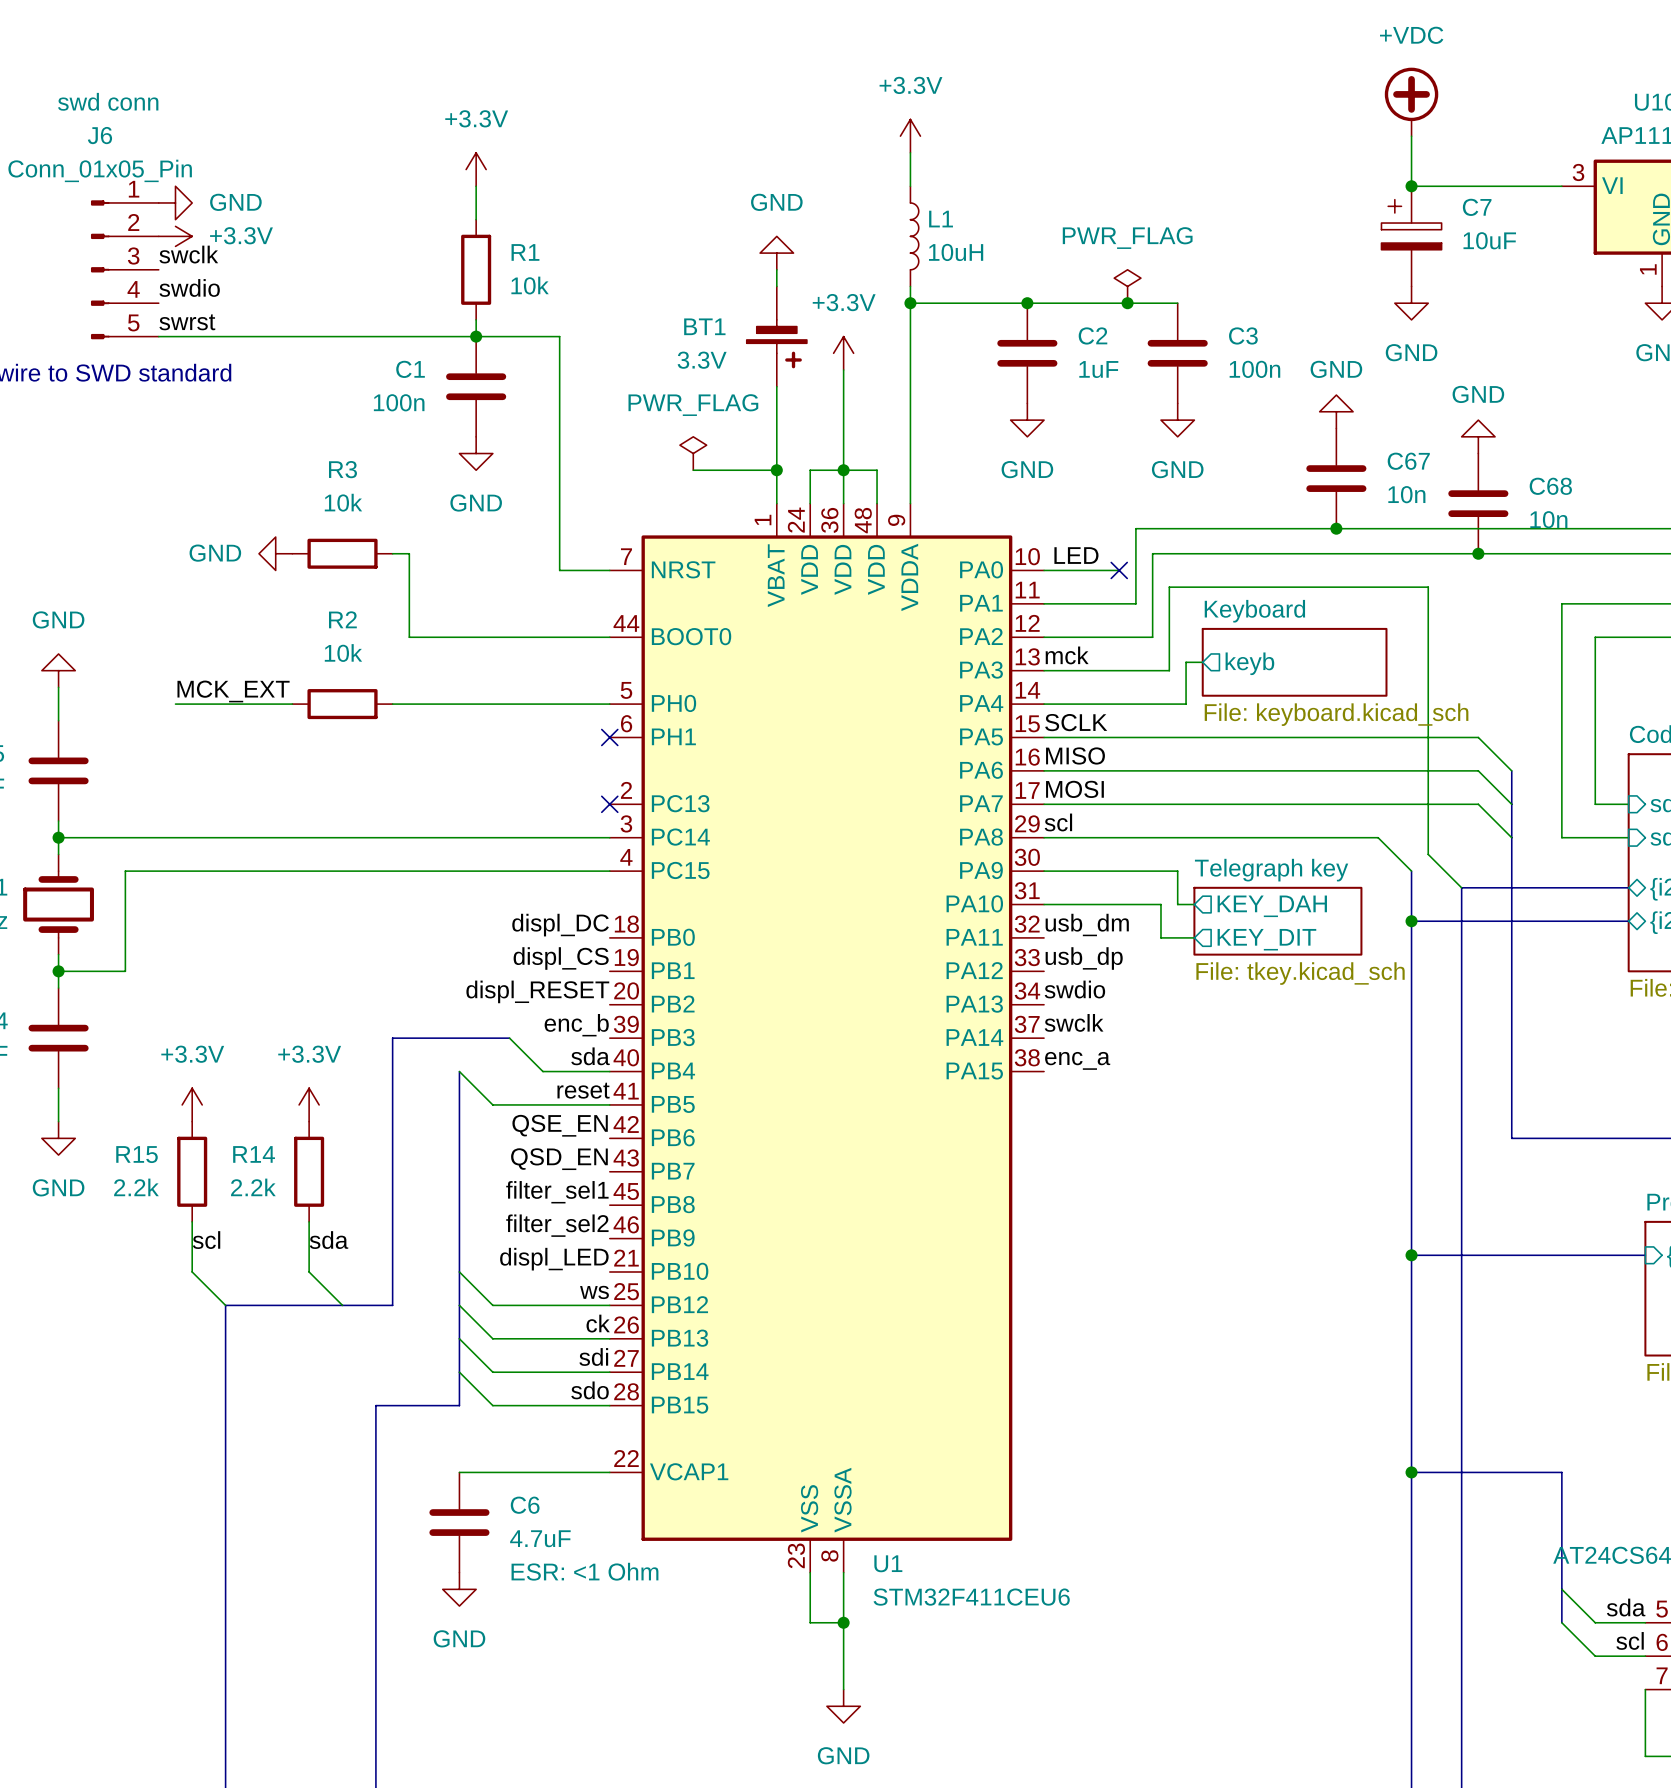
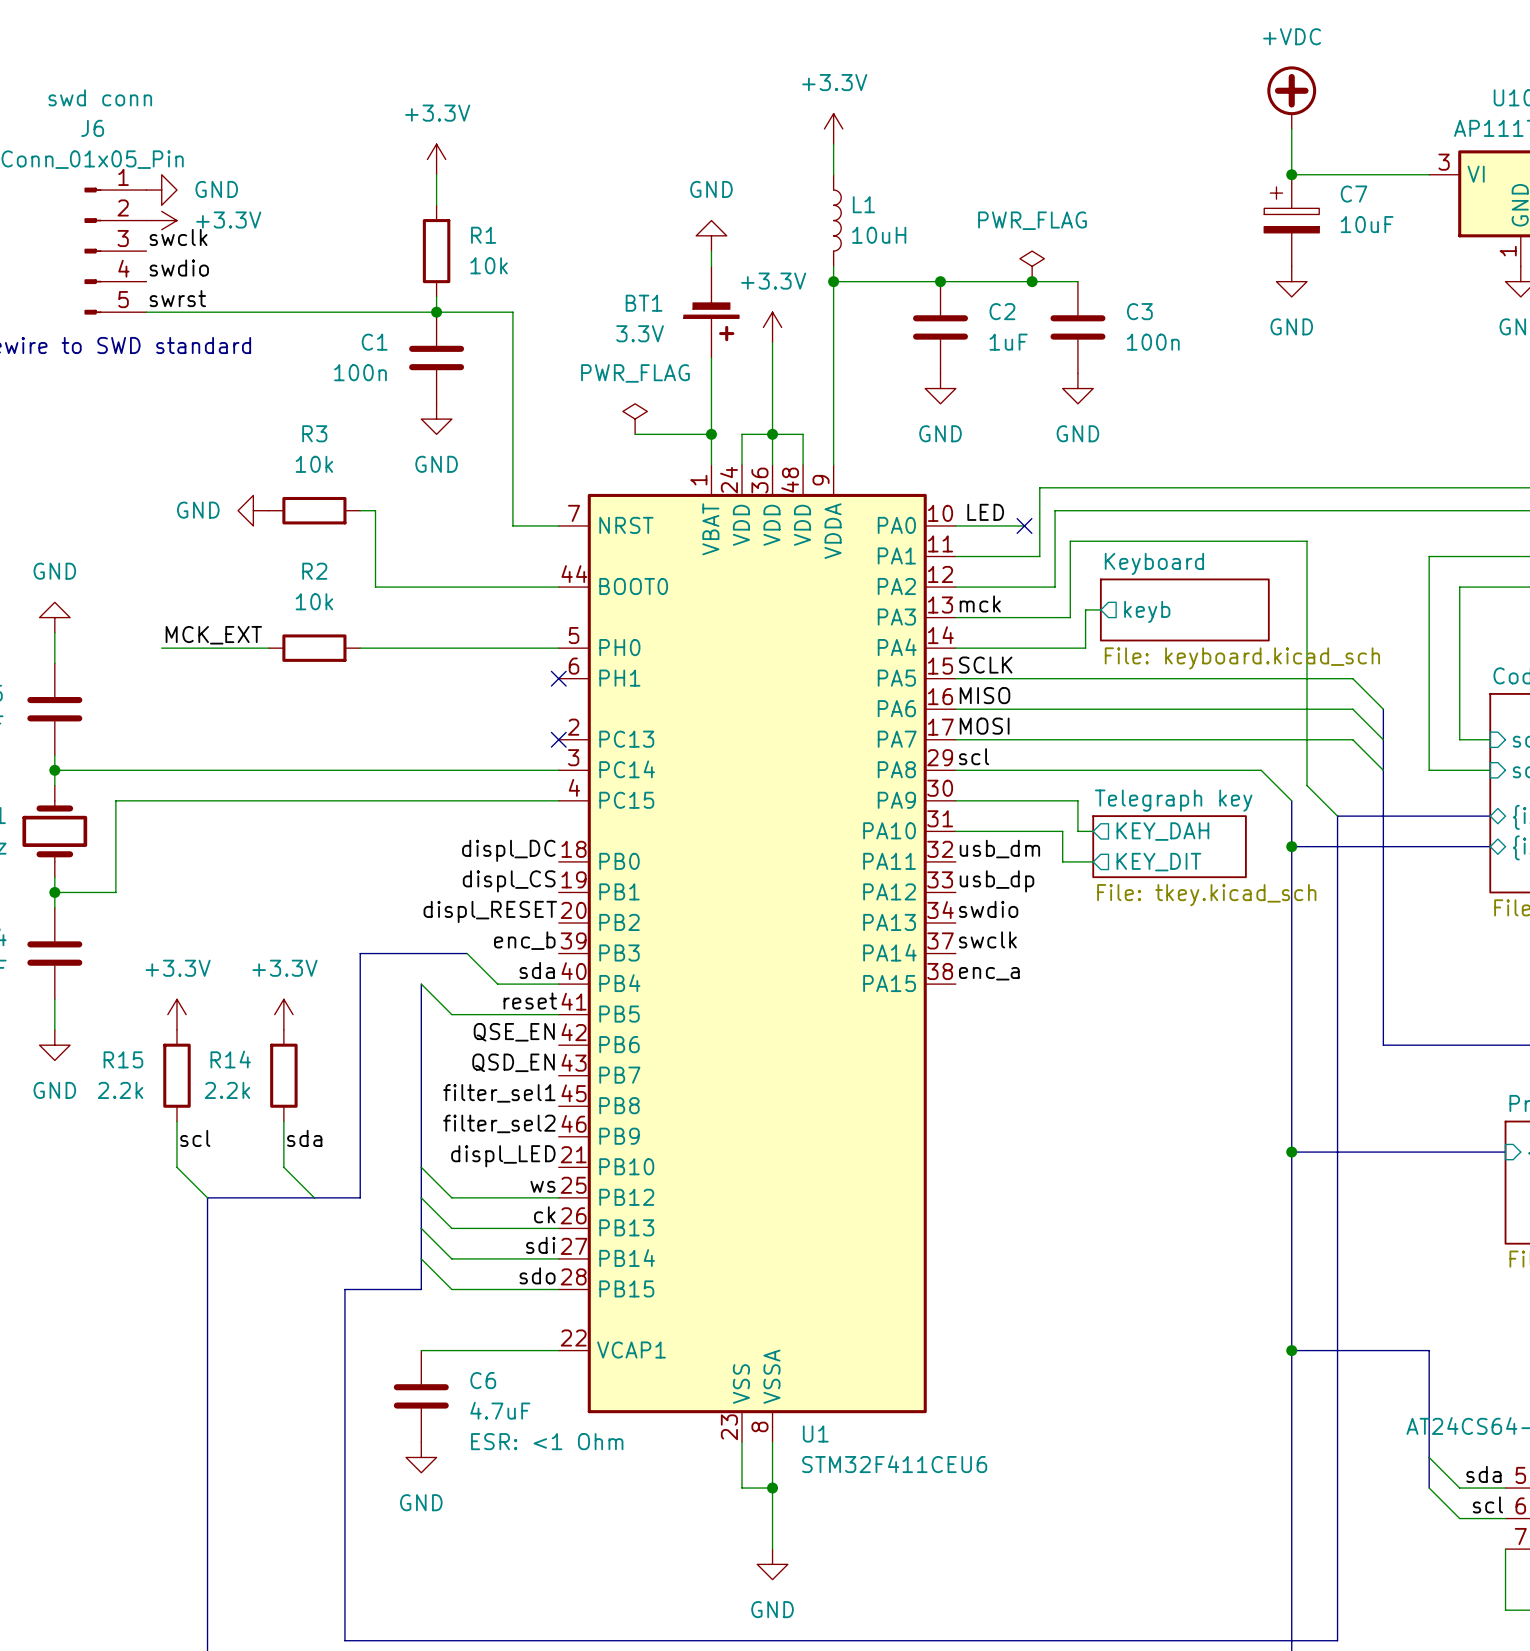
power symbol: GND (1336, 411) -> none
power symbol: GND (1478, 436) -> none
C67: 10n (1336, 478) -> none
C68: 10n (1478, 503) -> none
junction: (1336, 528) -> none
junction: (1478, 553) -> none

